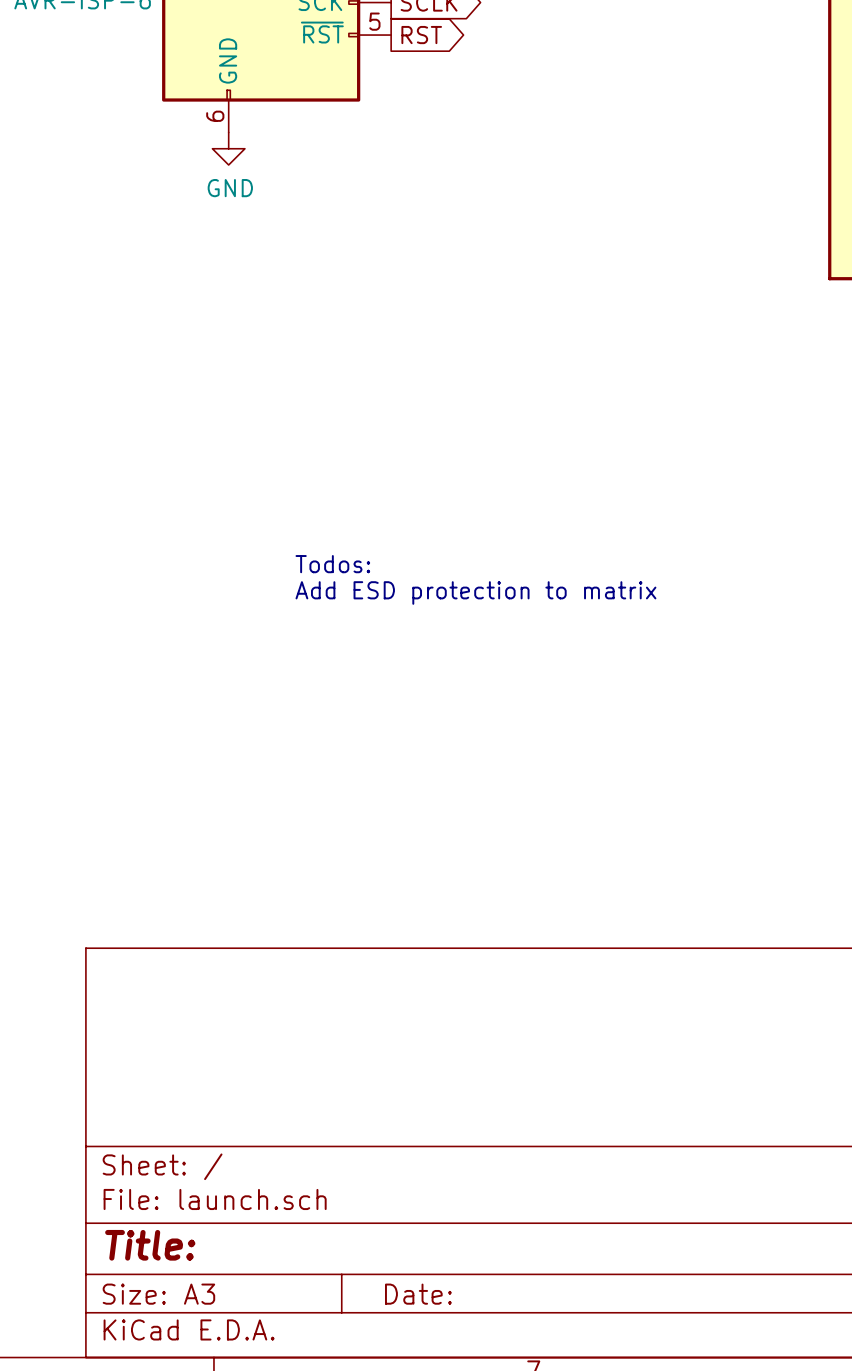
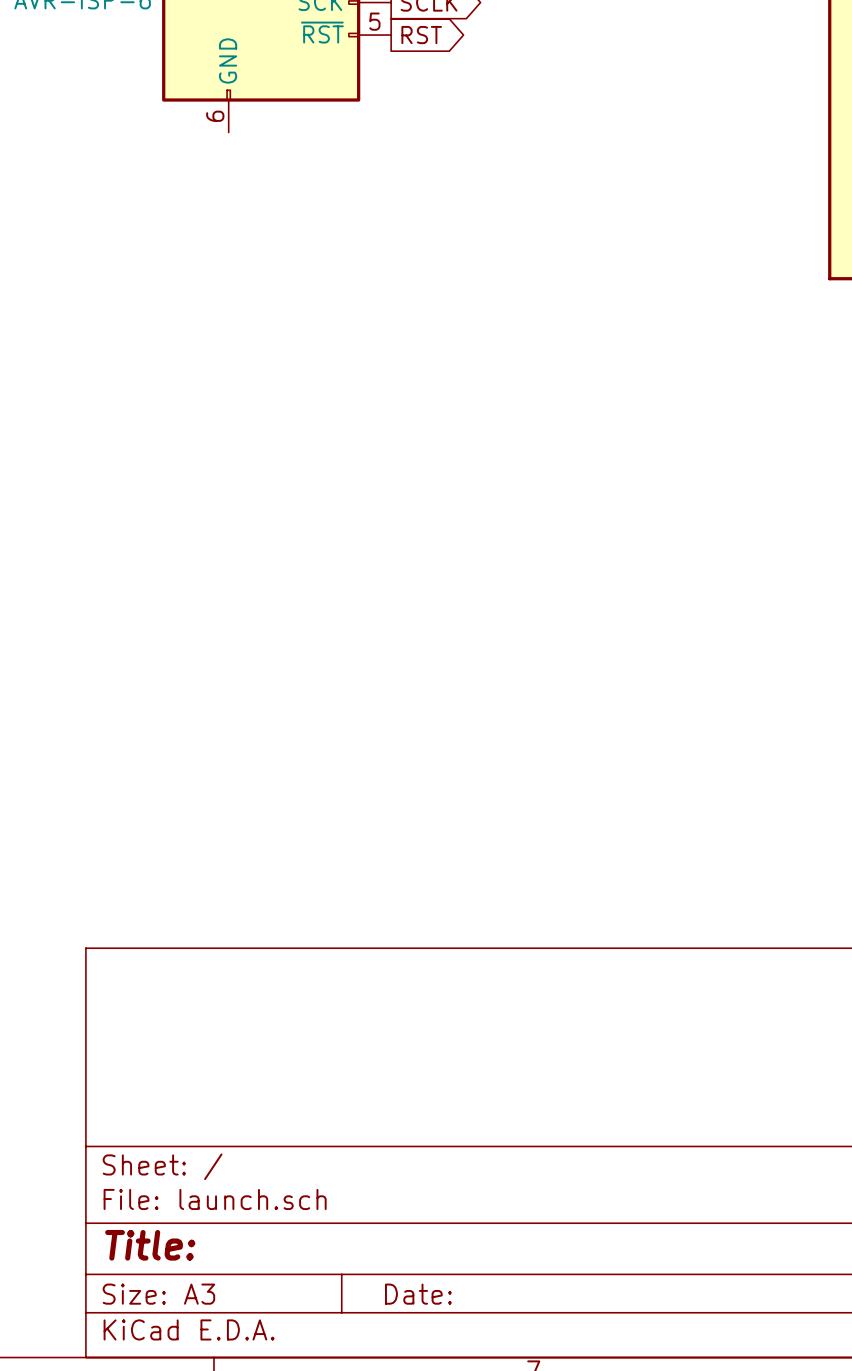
power symbol: GND (228, 148) -> none
text: Todos: (332, 564) -> none
text: Add ESD protection to matrix (475, 593) -> none

